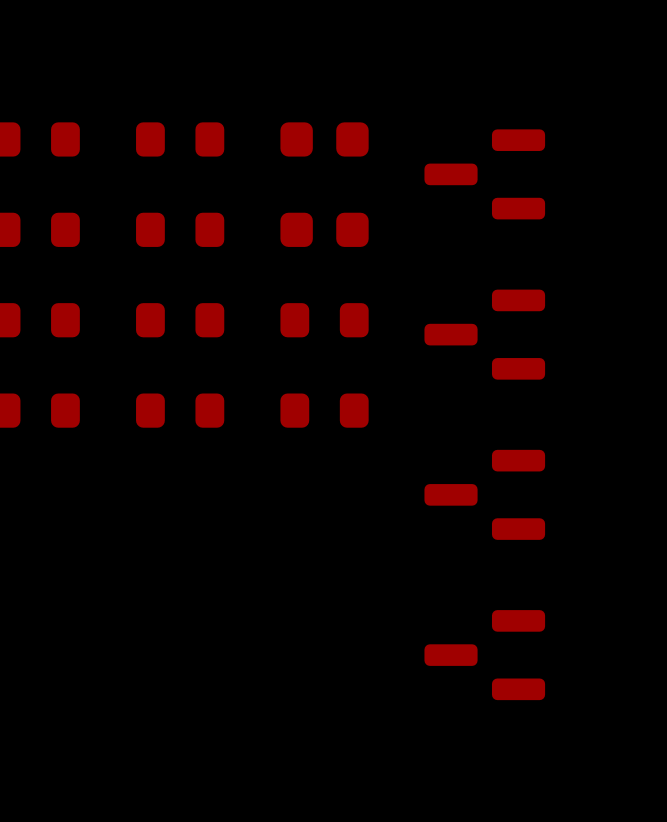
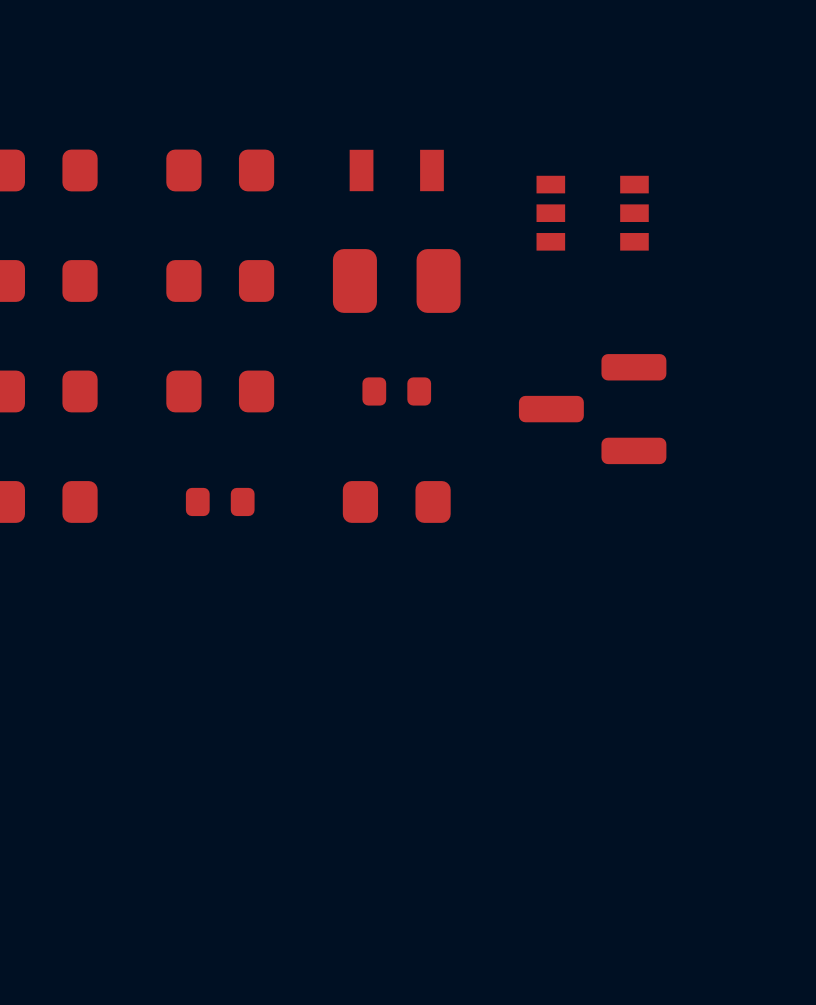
part footprint: [280, 122, 369, 157] -> [349, 149, 444, 192]
part footprint: [424, 129, 546, 220] -> [536, 175, 649, 251]
part footprint: [280, 212, 369, 247] -> [332, 249, 461, 313]
part footprint: [280, 303, 369, 338] -> [362, 377, 432, 406]
part footprint: [136, 393, 225, 428] -> [185, 487, 255, 517]
part: (484, 494) -> none
part: (484, 655) -> none

